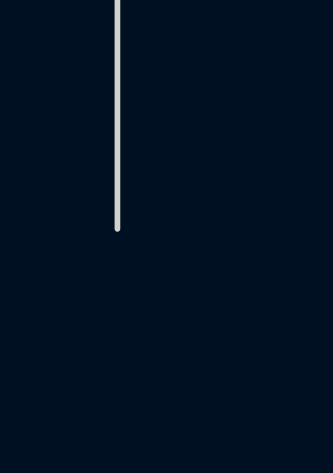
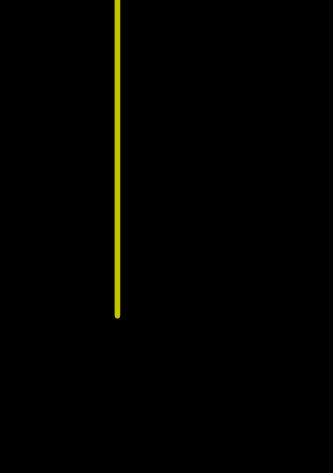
board edge: none -> (117, 228) (117, 315)

